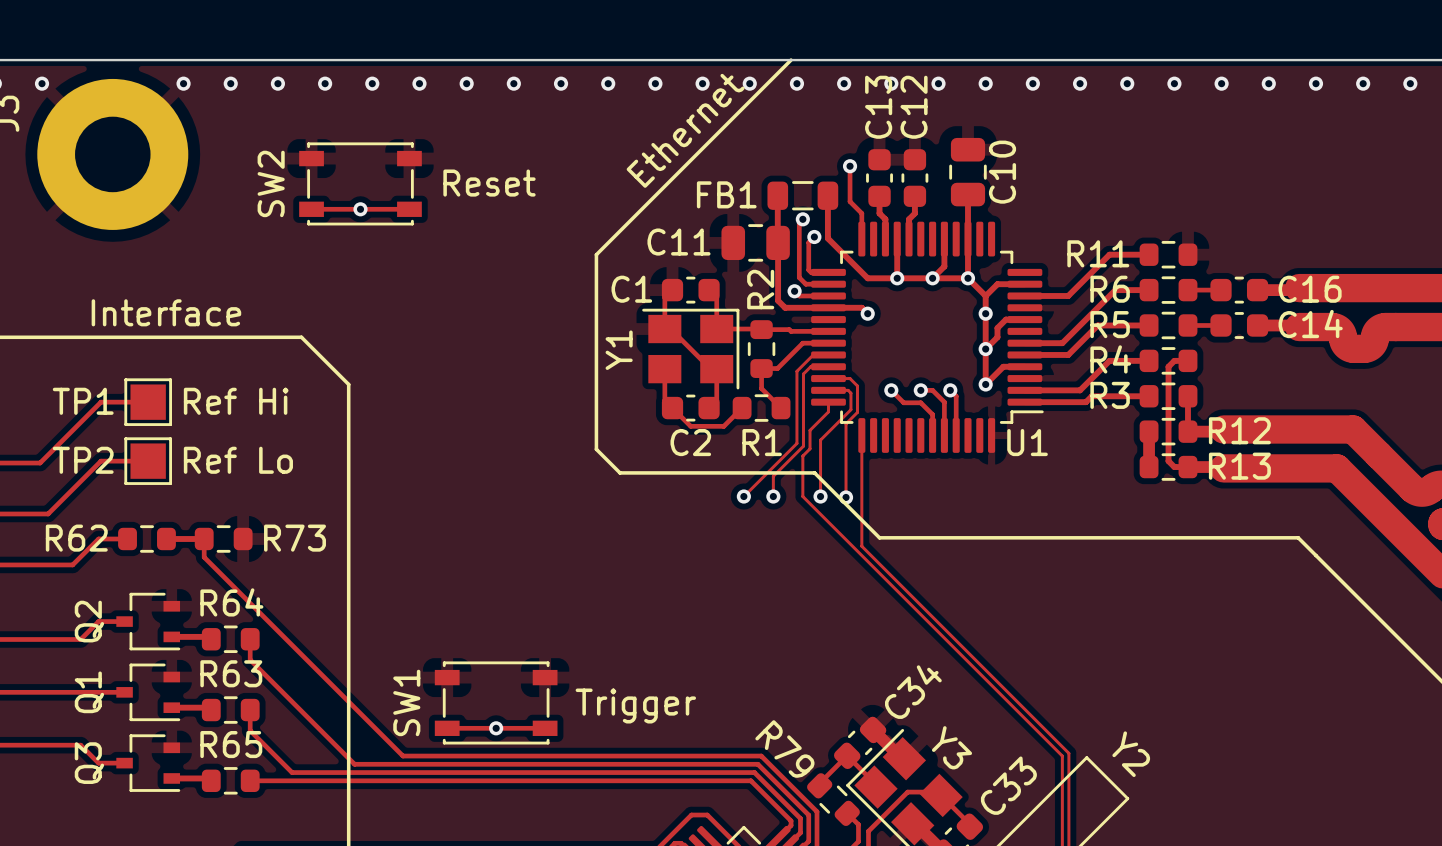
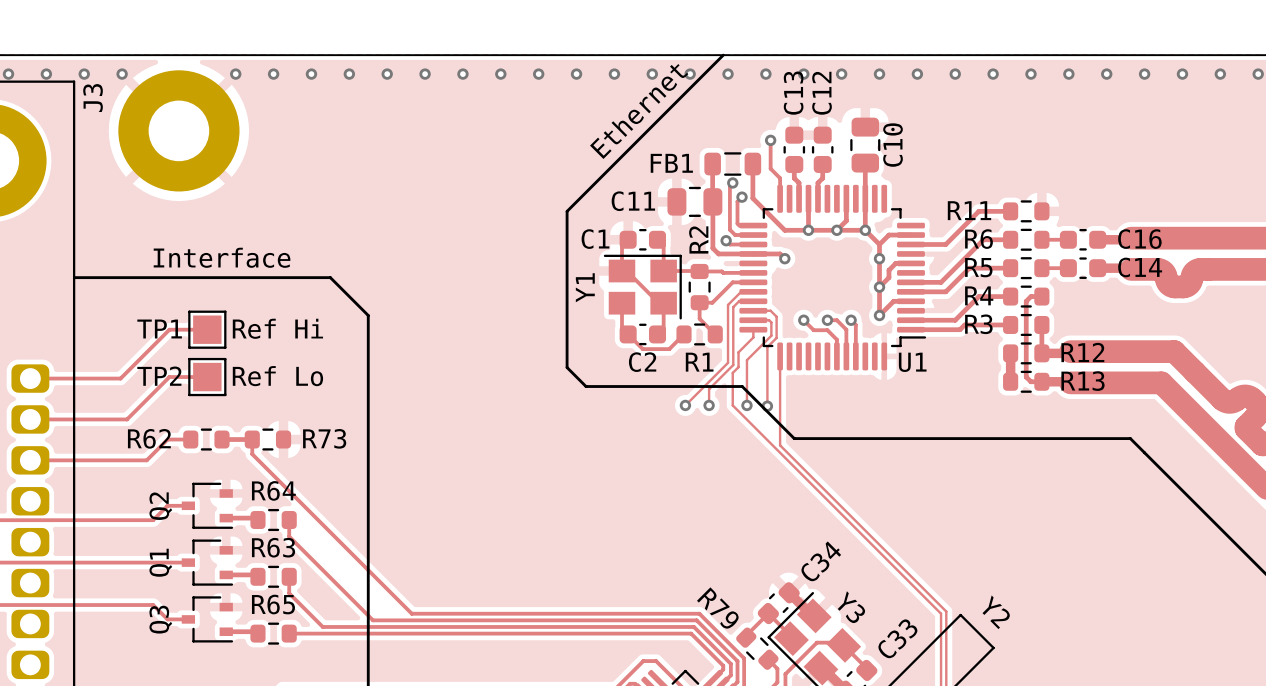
SW2: (360, 183) -> none
text: Reset (489, 183) -> none
track: (311, 209) (409, 209) -> none
via: (360, 209) -> none
SW1: (496, 702) -> none
text: Trigger (635, 706) -> none
track: (447, 728) (545, 728) -> none
via: (496, 728) -> none

